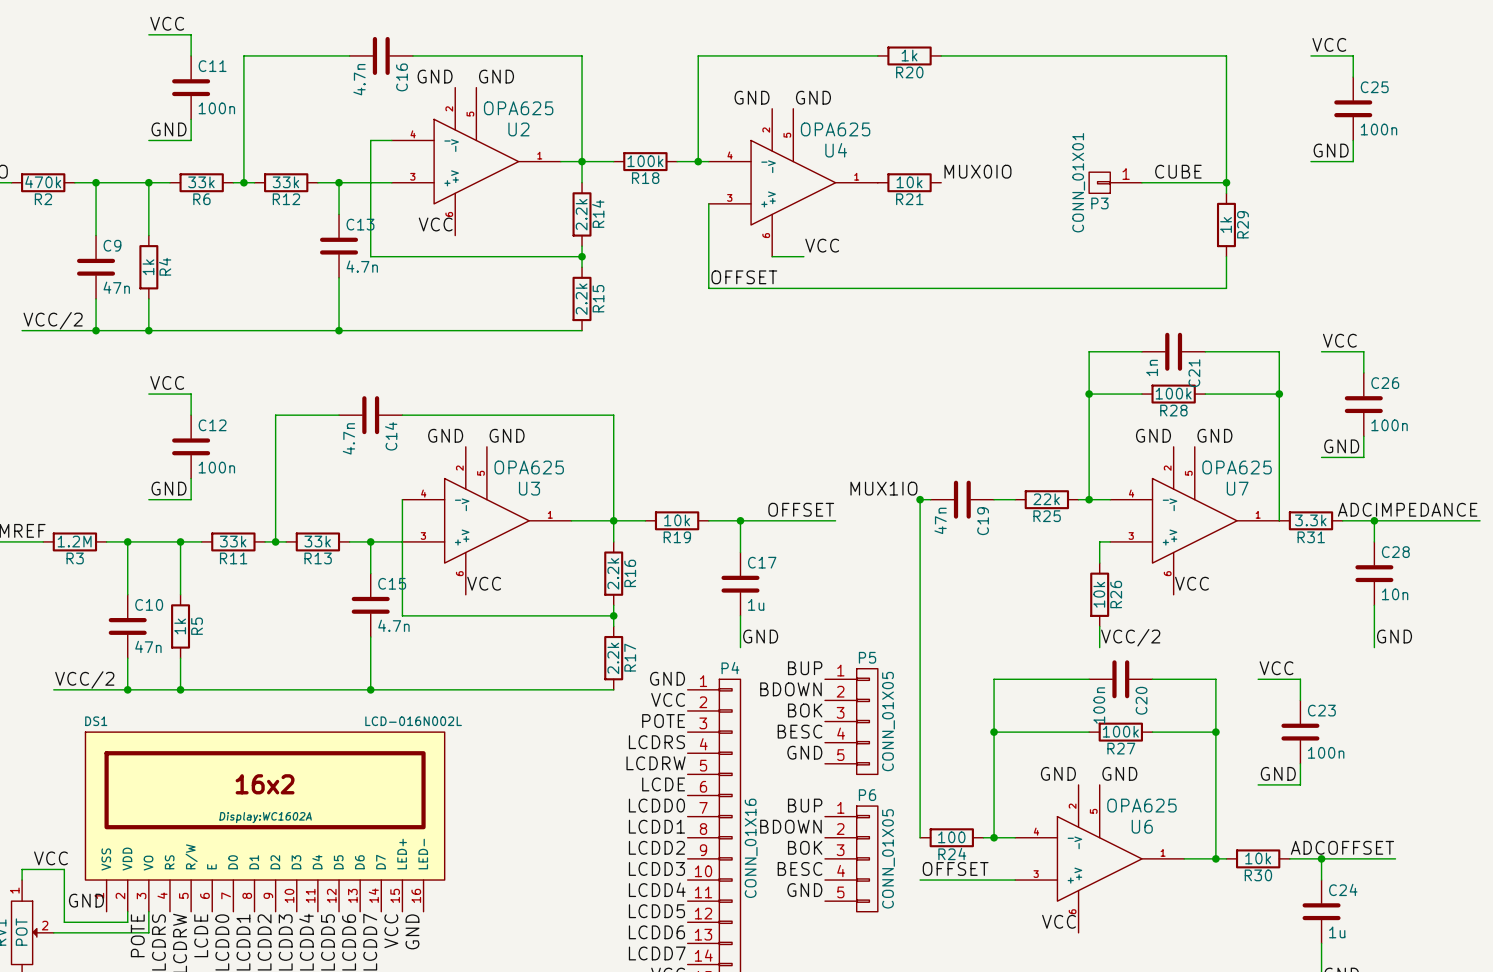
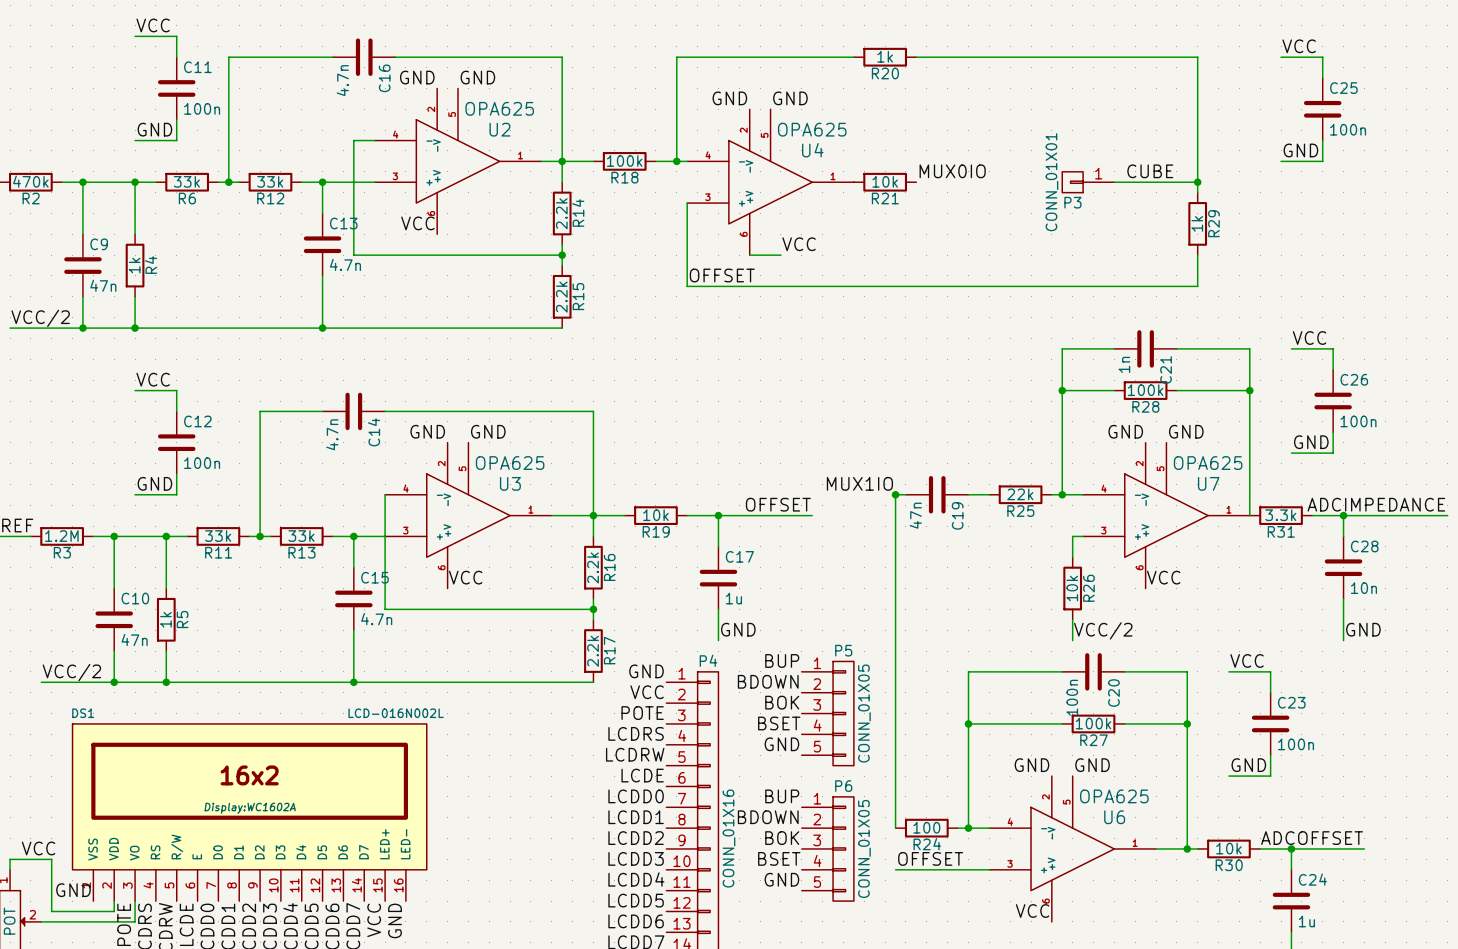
label: BESC (800, 731) -> BSET (779, 723)
label: BESC (800, 868) -> BSET (779, 858)

